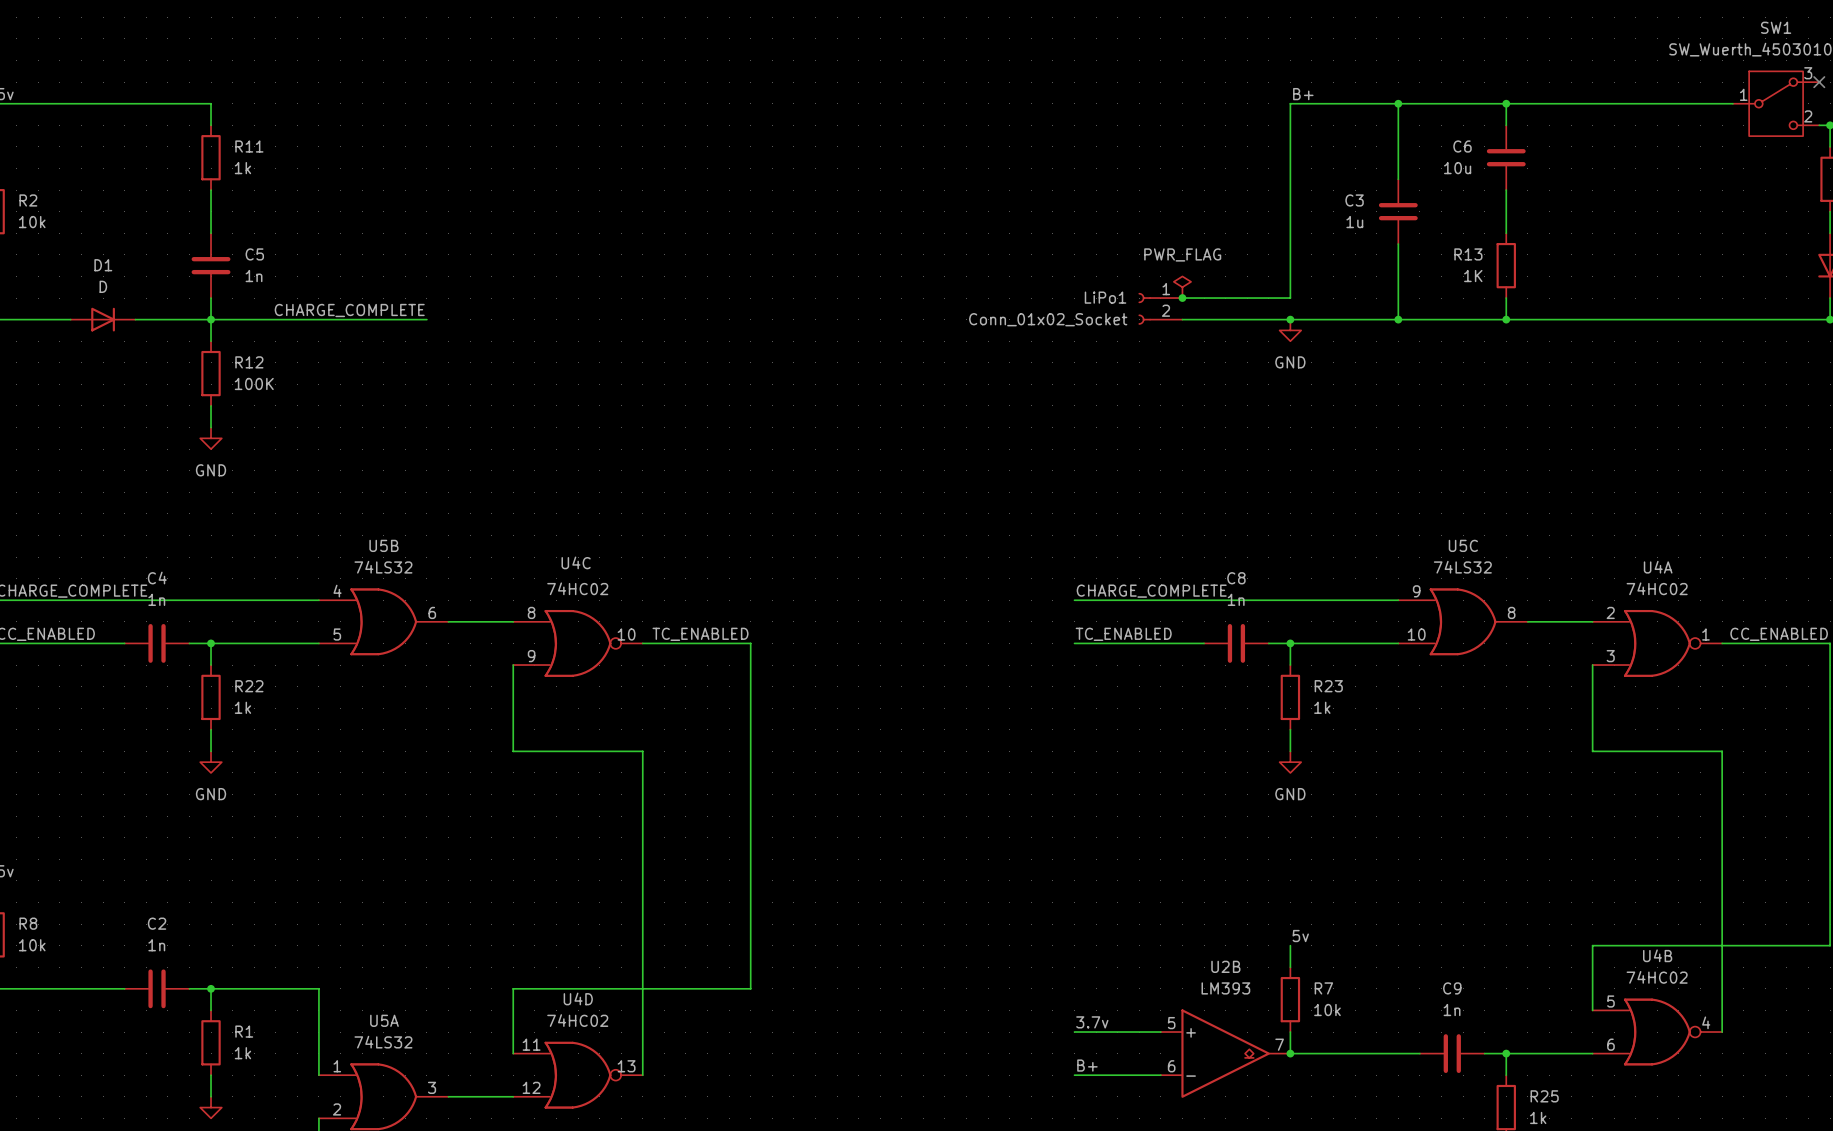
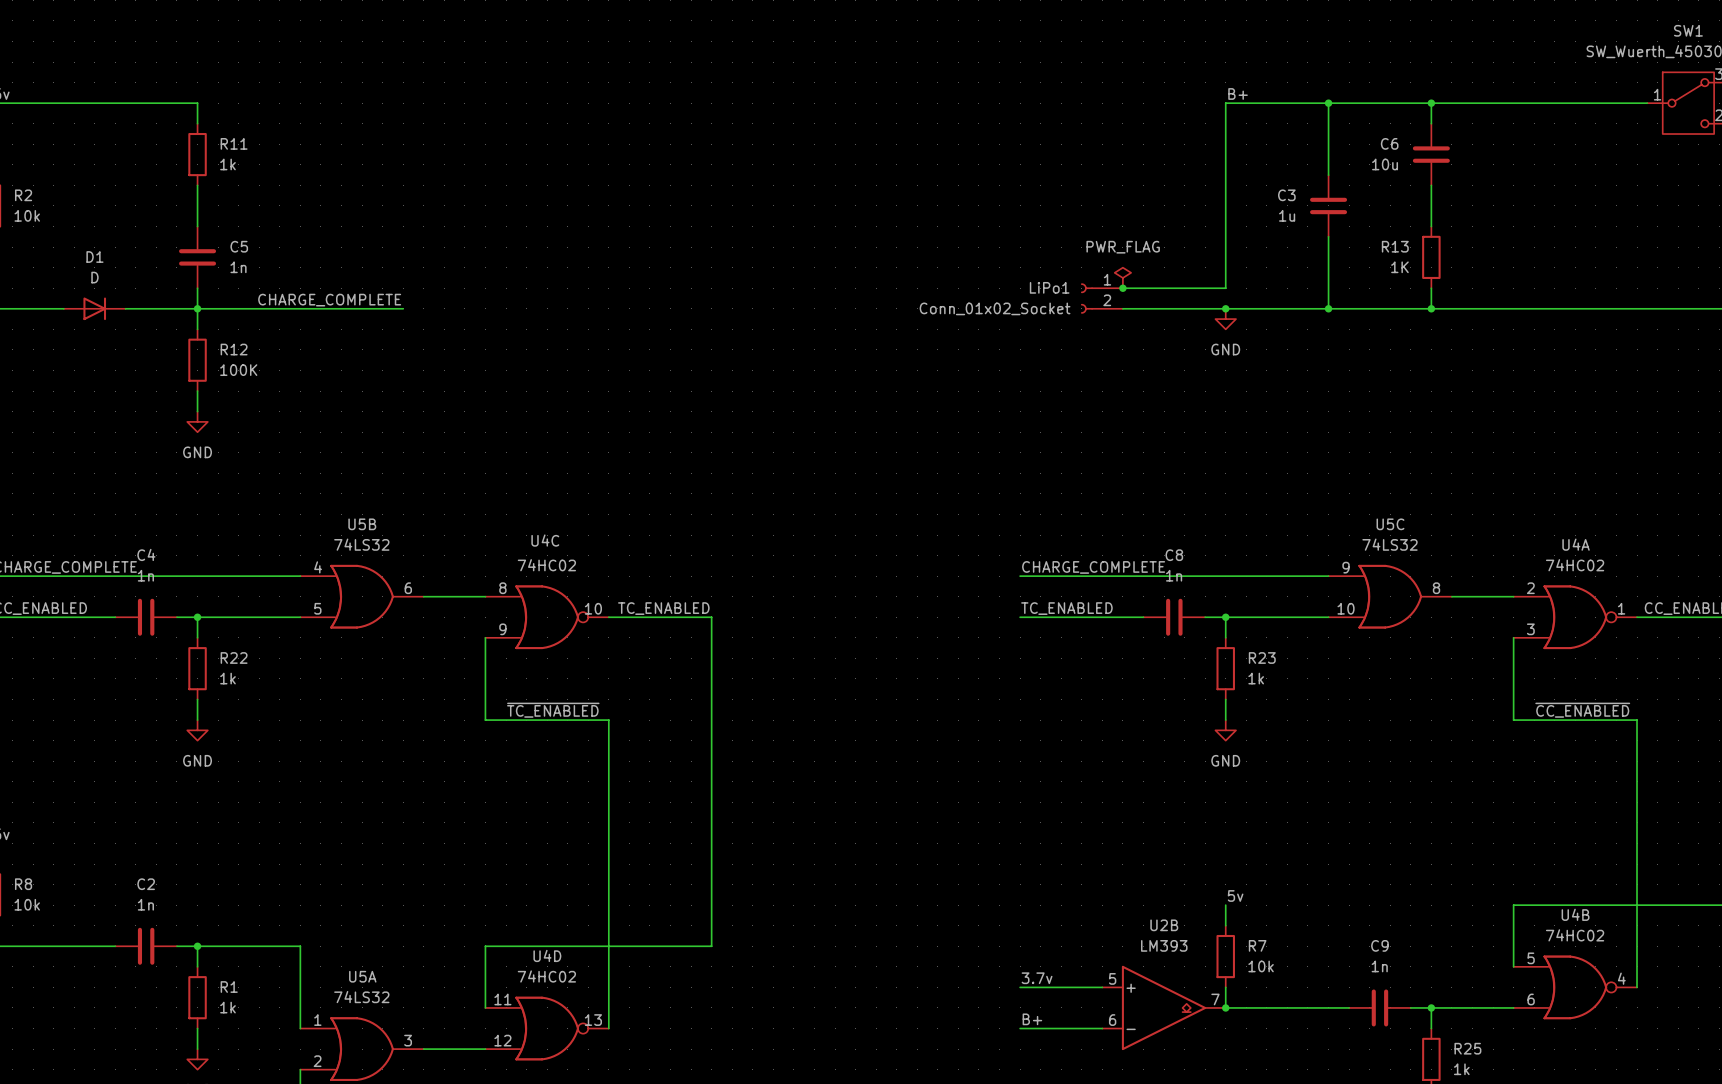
label: none -> ~{TC_ENABLED} (553, 710)
label: none -> ~{CC_ENABLED} (1582, 710)

